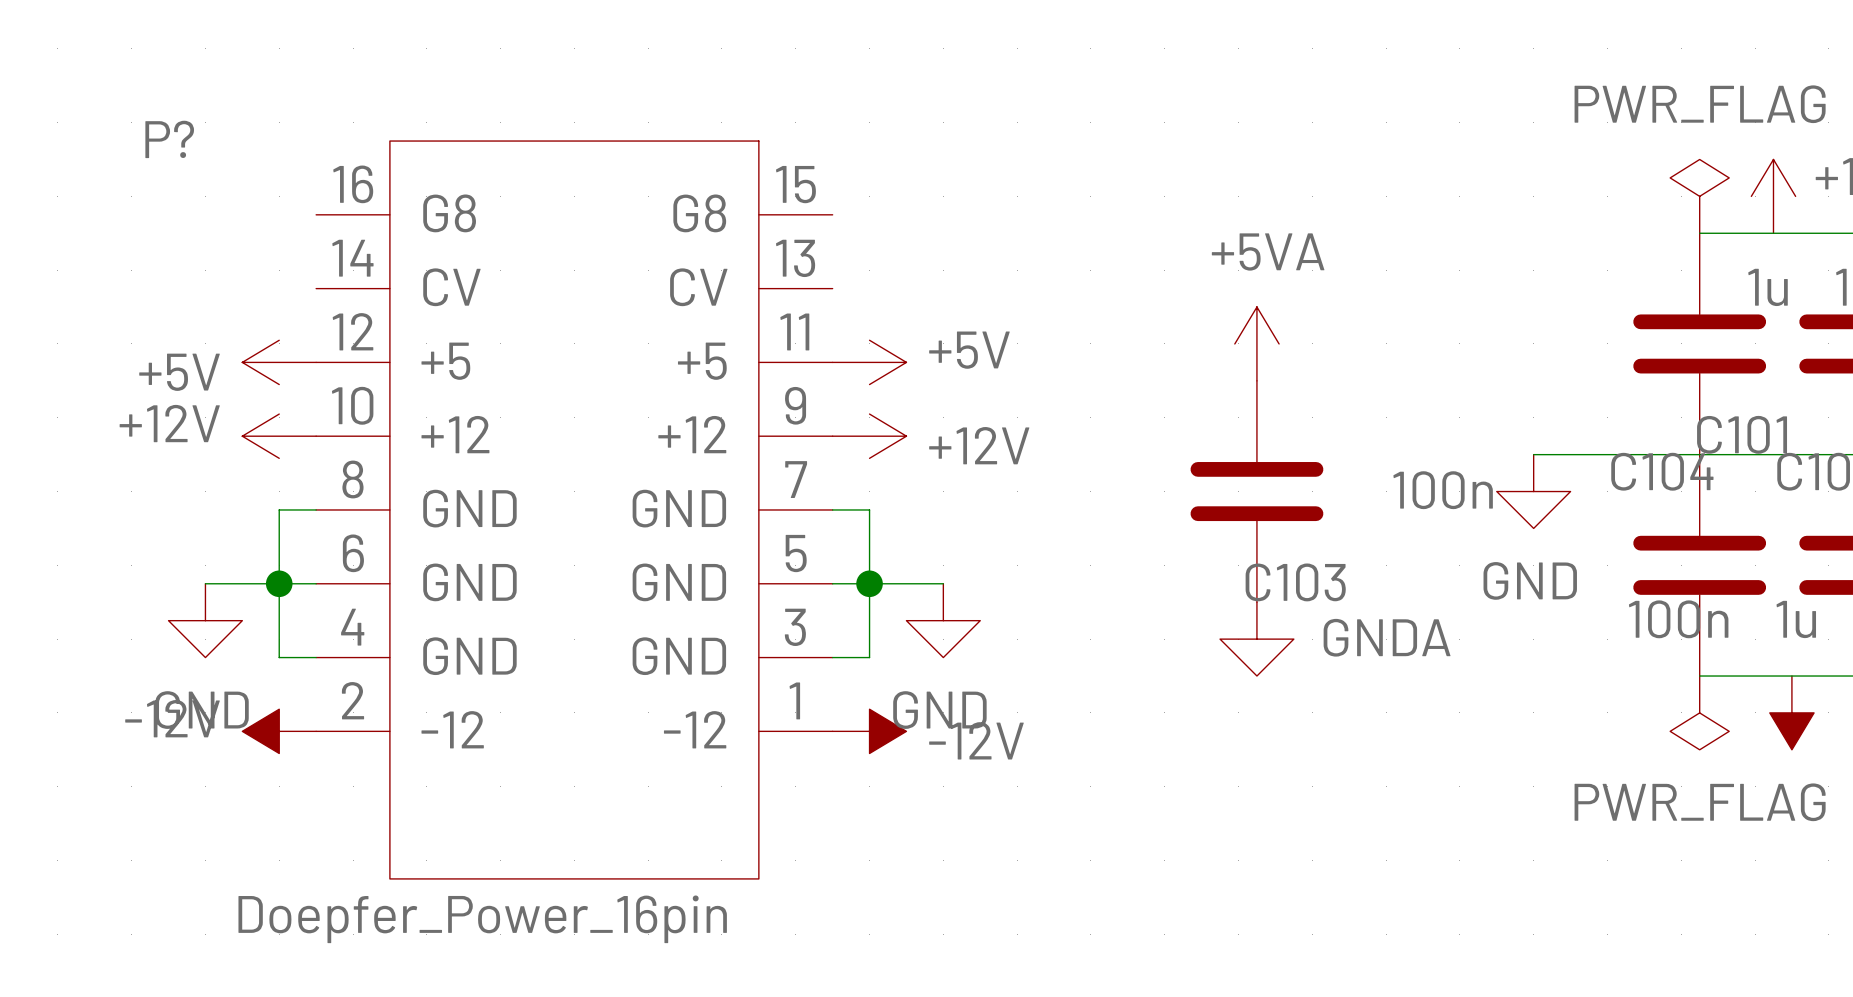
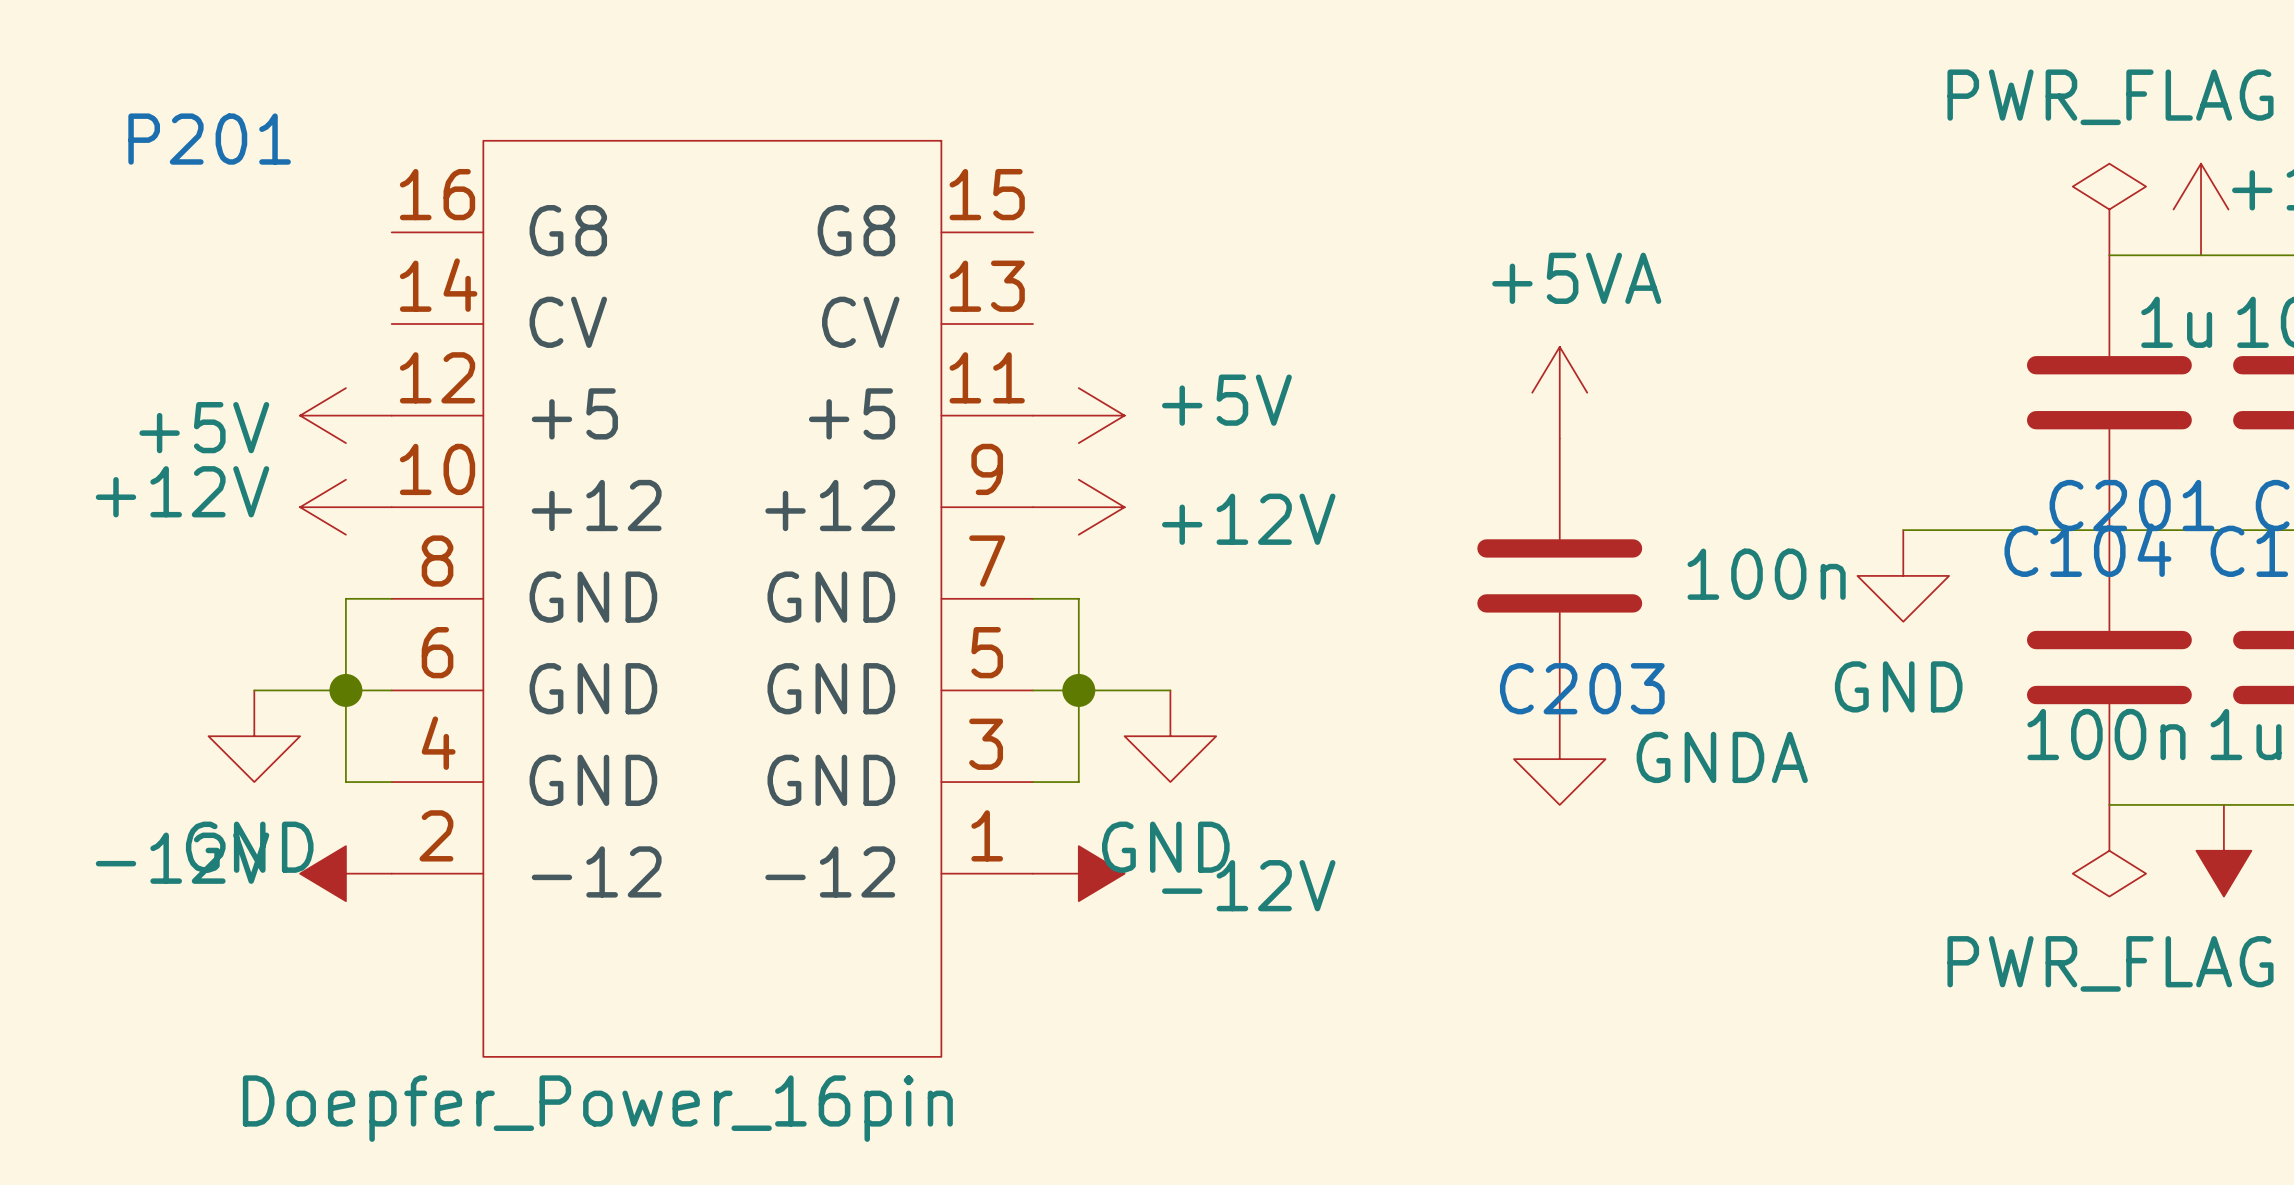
P? name: P? (169, 139) -> P201 (209, 139)
C101 name: C101 (1742, 434) -> C201 (2131, 505)
C103 name: C103 (1295, 582) -> C203 (1582, 688)

